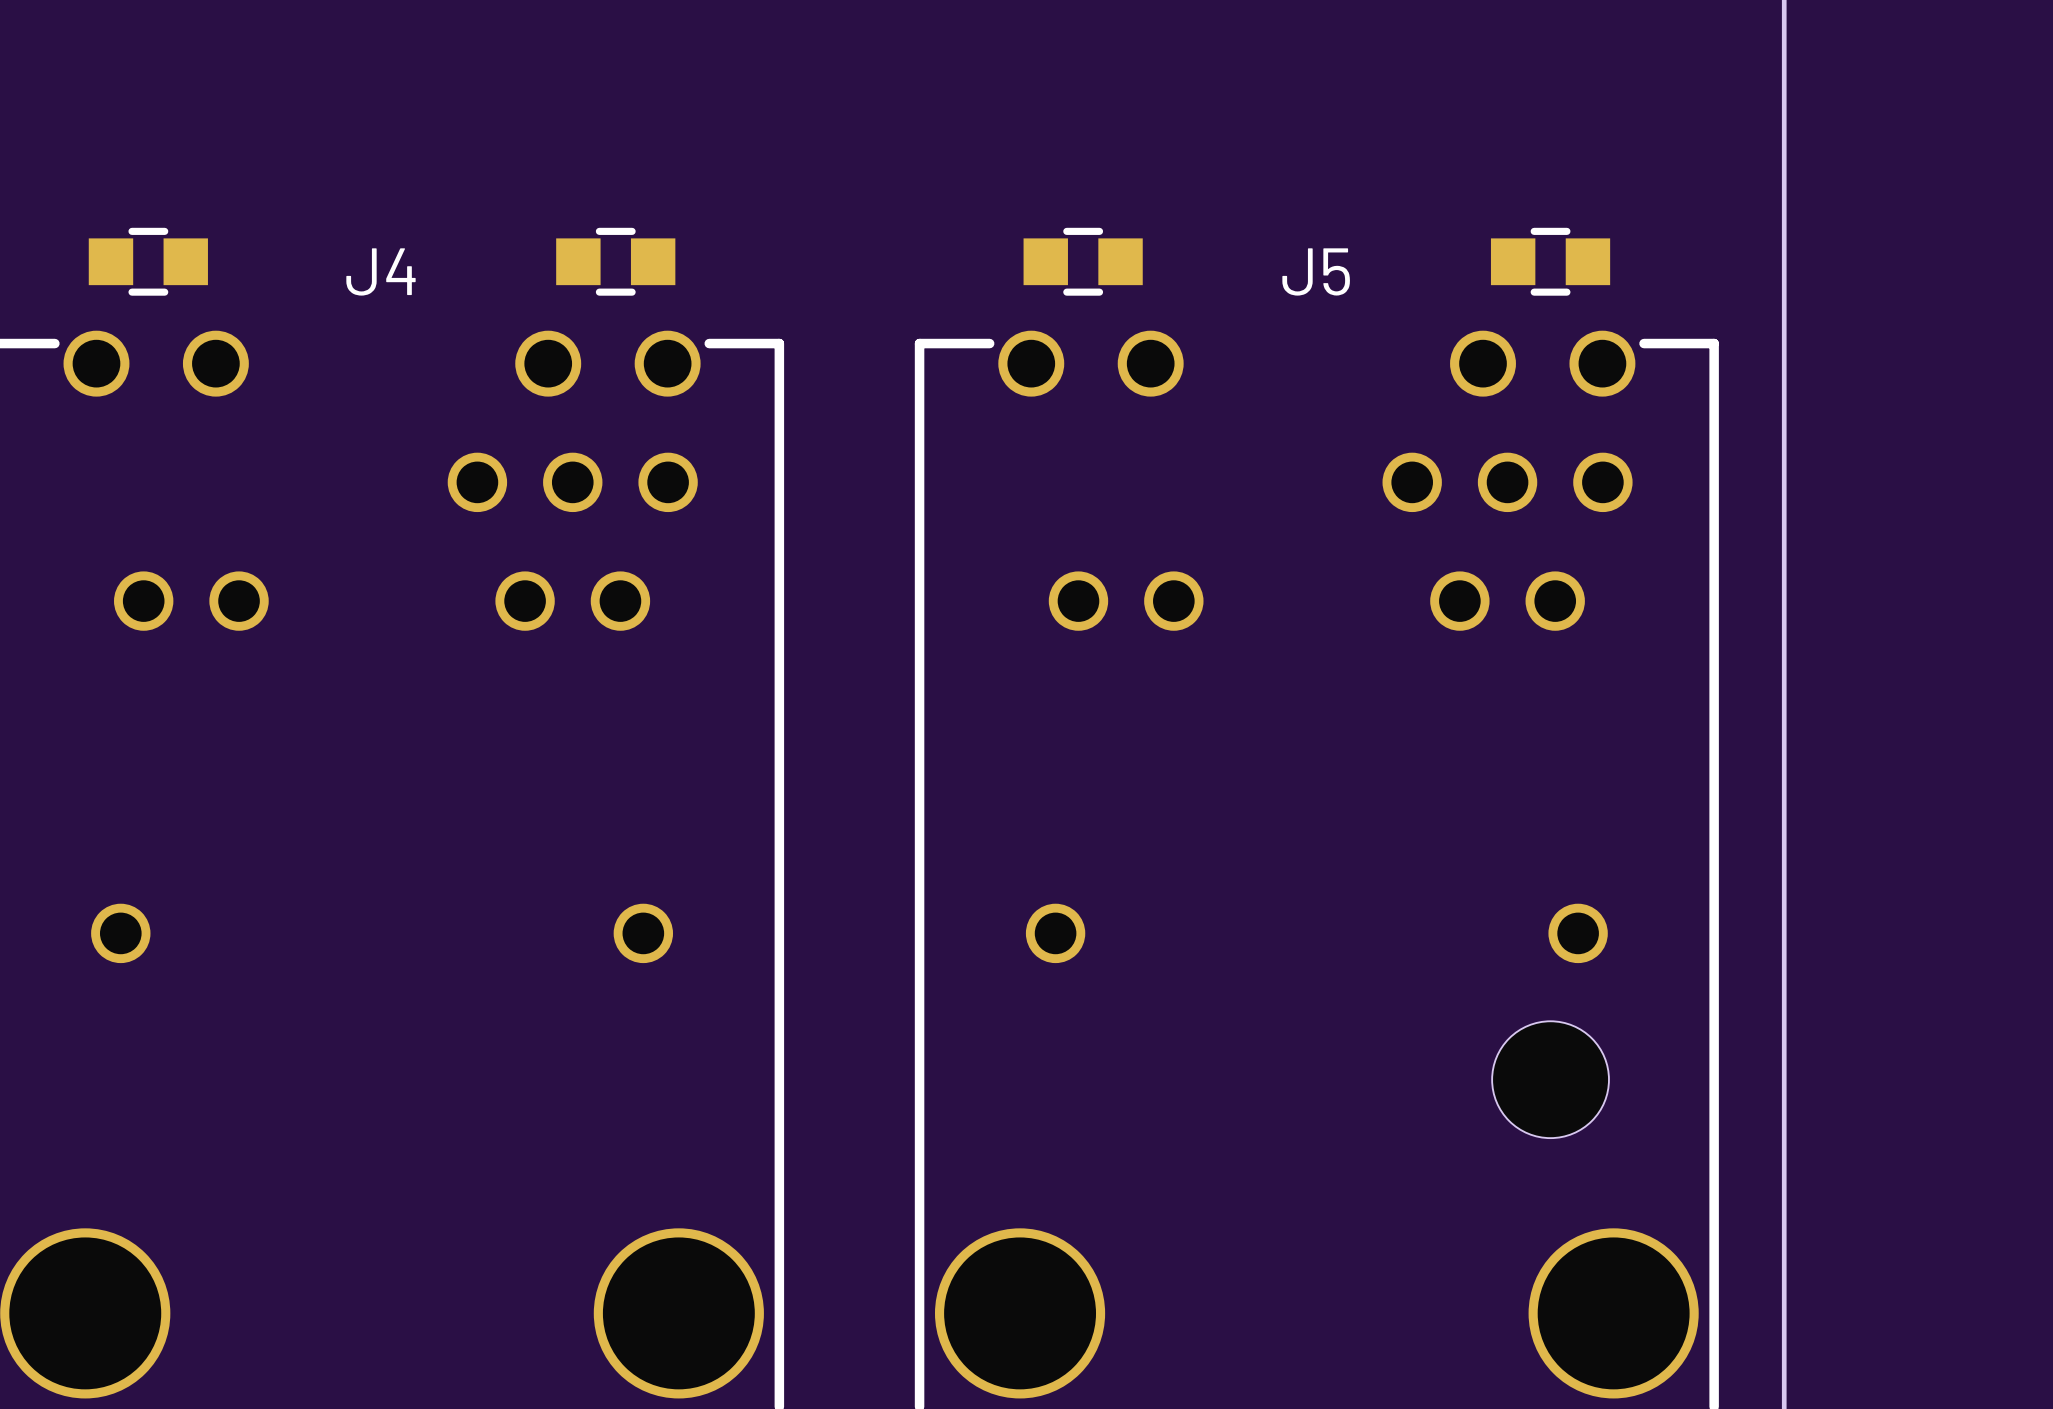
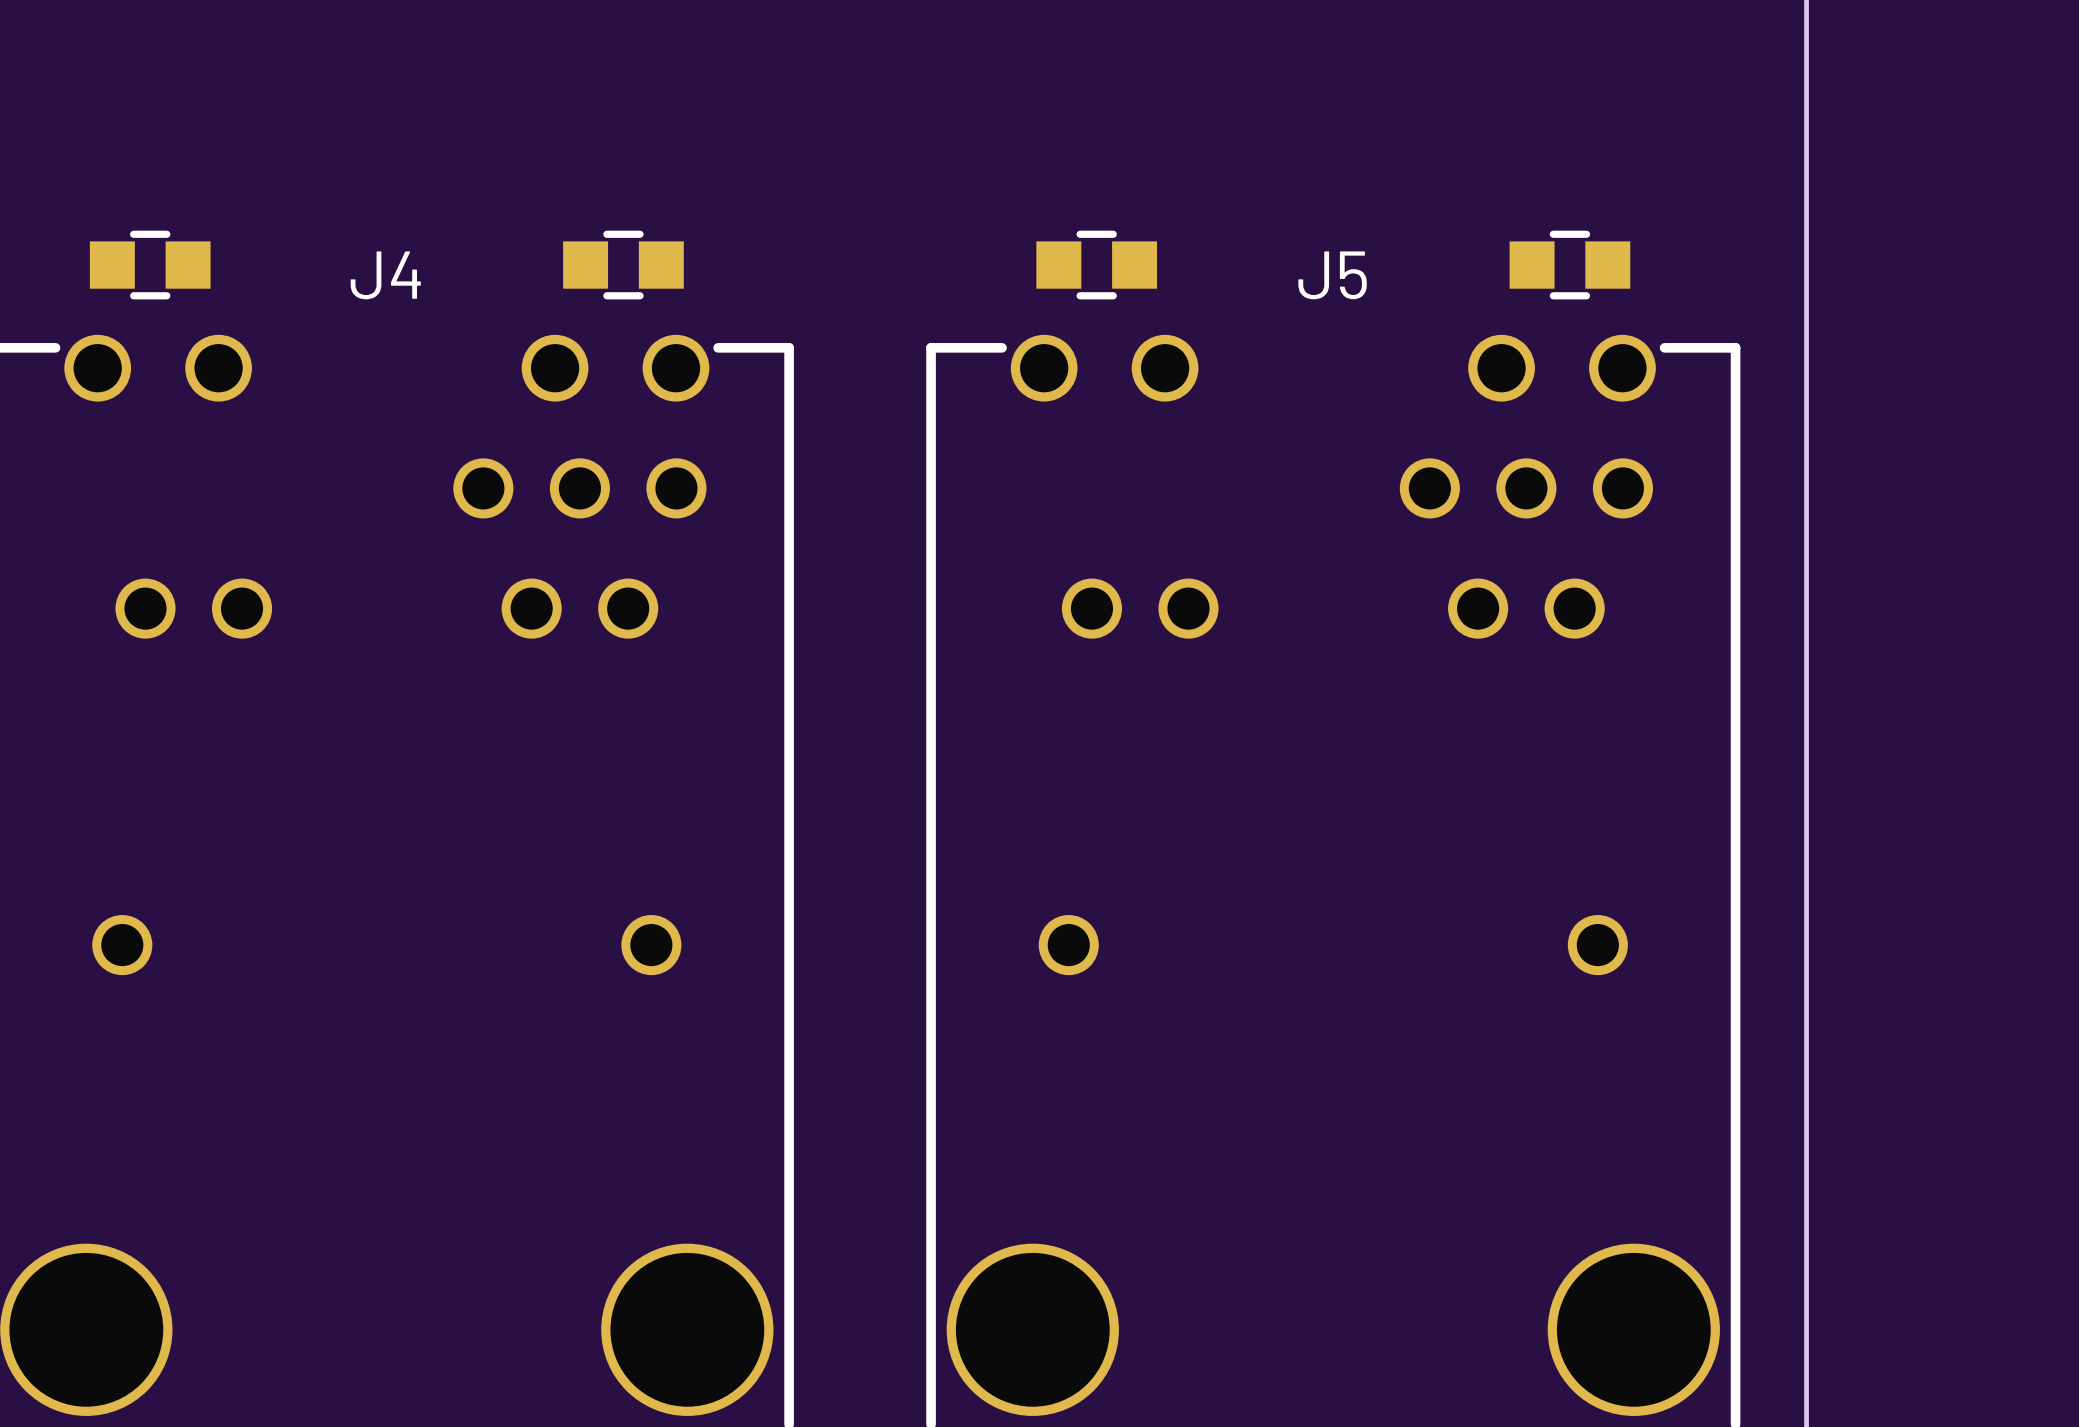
part: (1550, 1079) -> none

